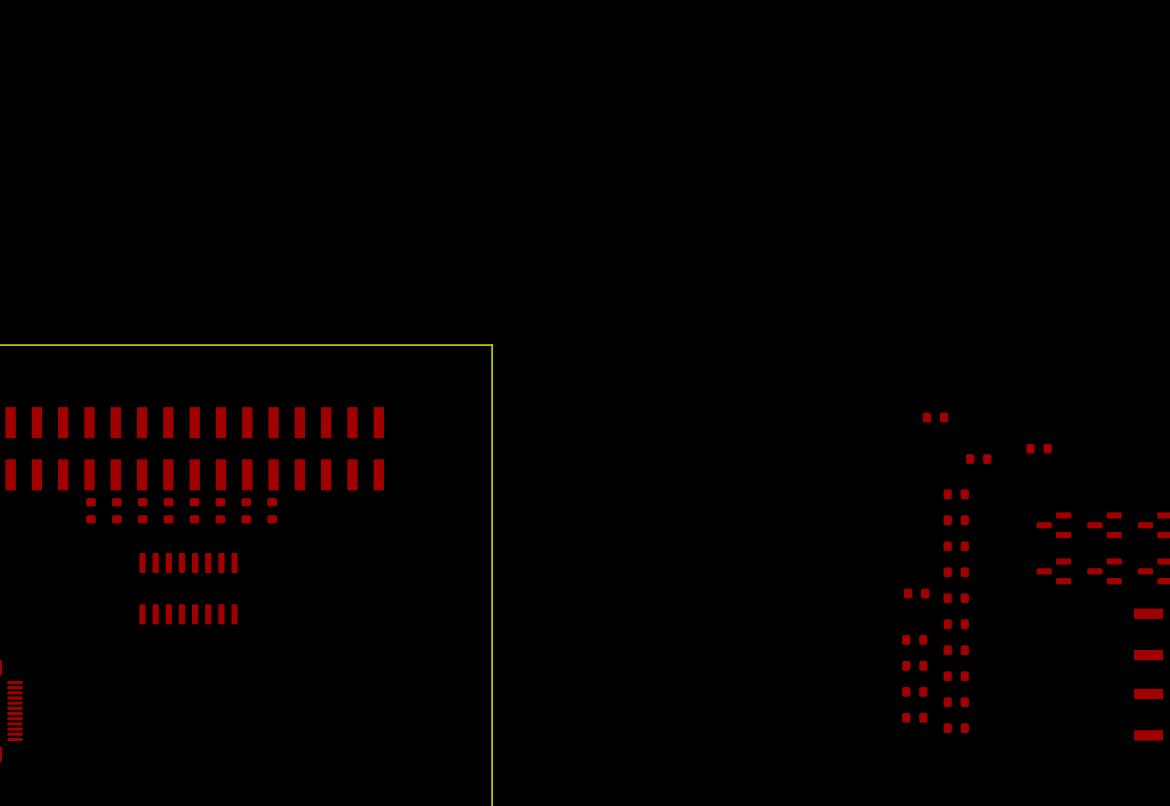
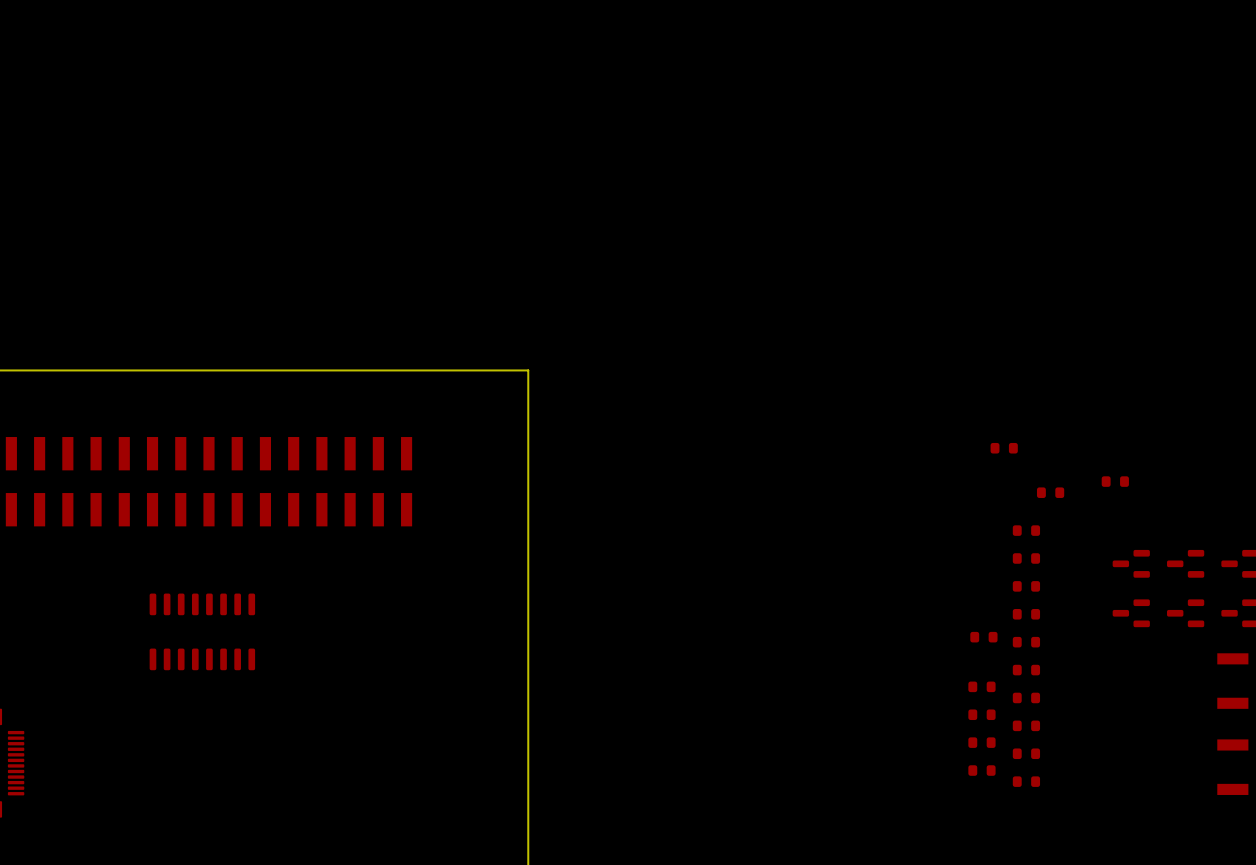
part: (90, 510) -> none
part: (116, 510) -> none
part: (142, 510) -> none
part: (168, 510) -> none
part: (194, 510) -> none
part: (220, 510) -> none
part: (246, 510) -> none
part: (272, 510) -> none

